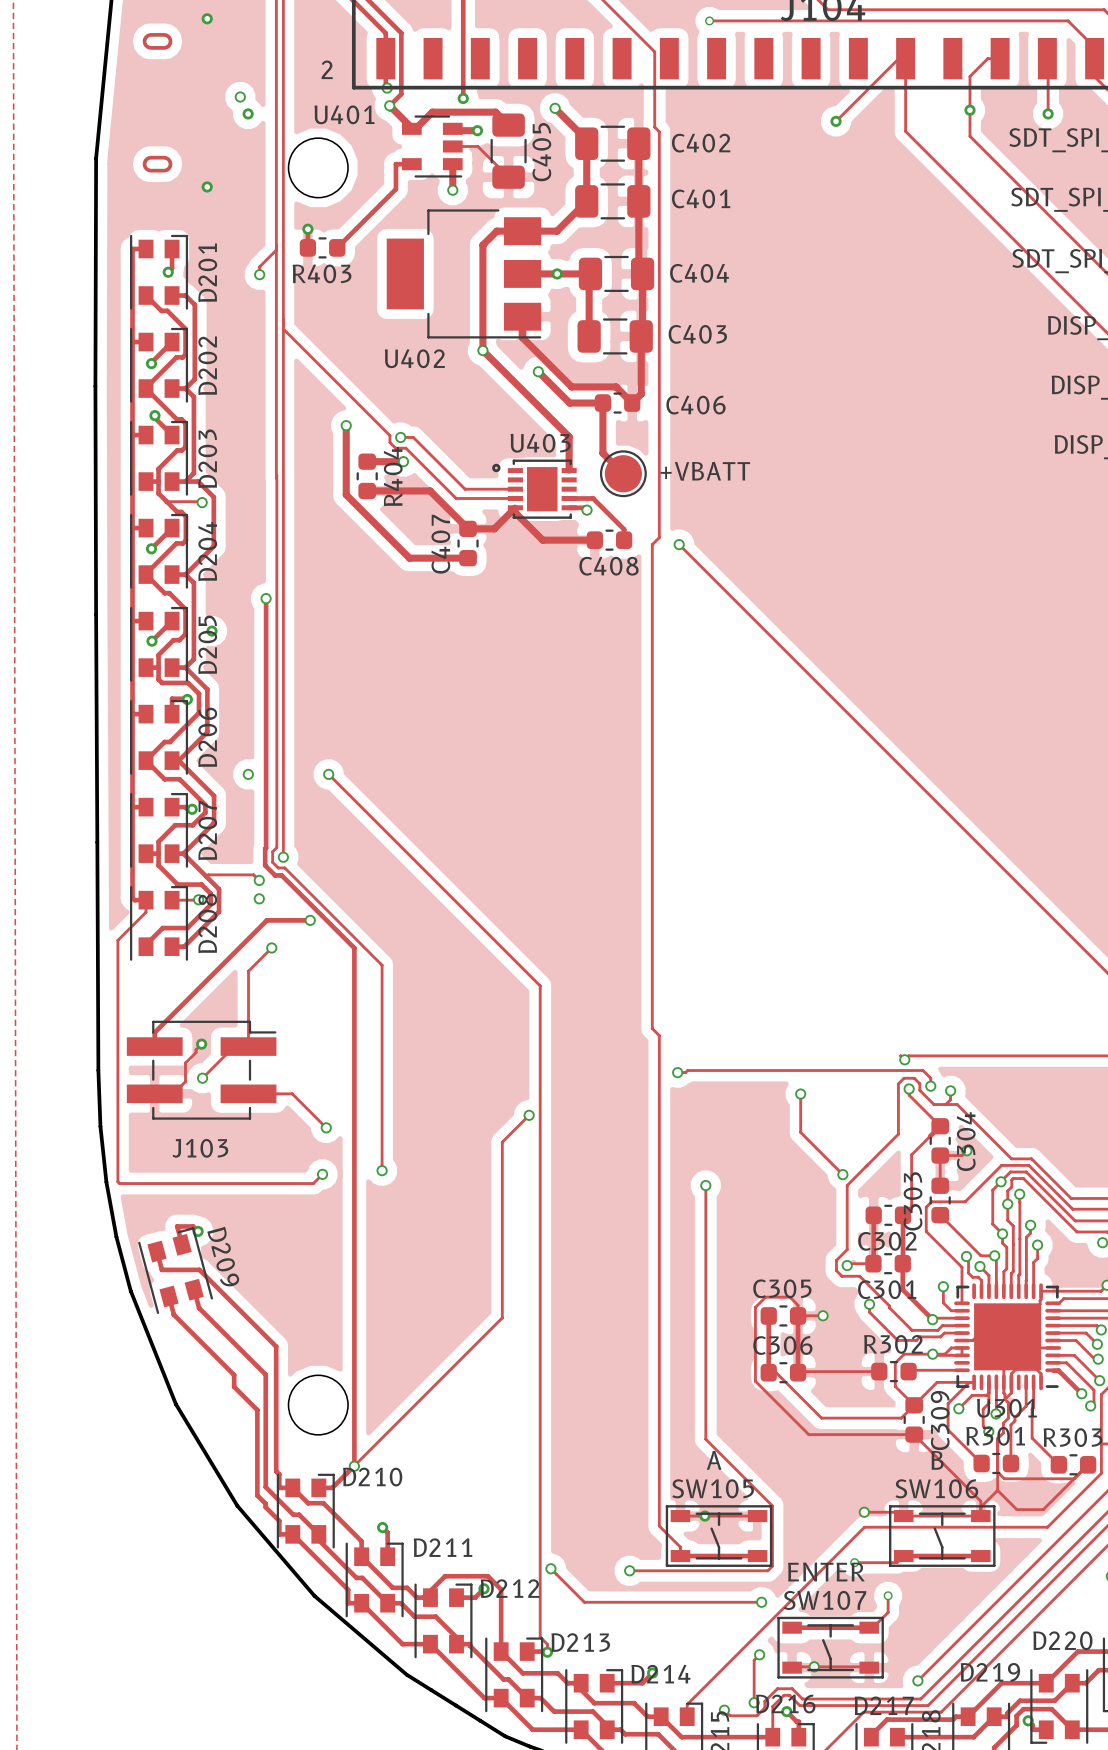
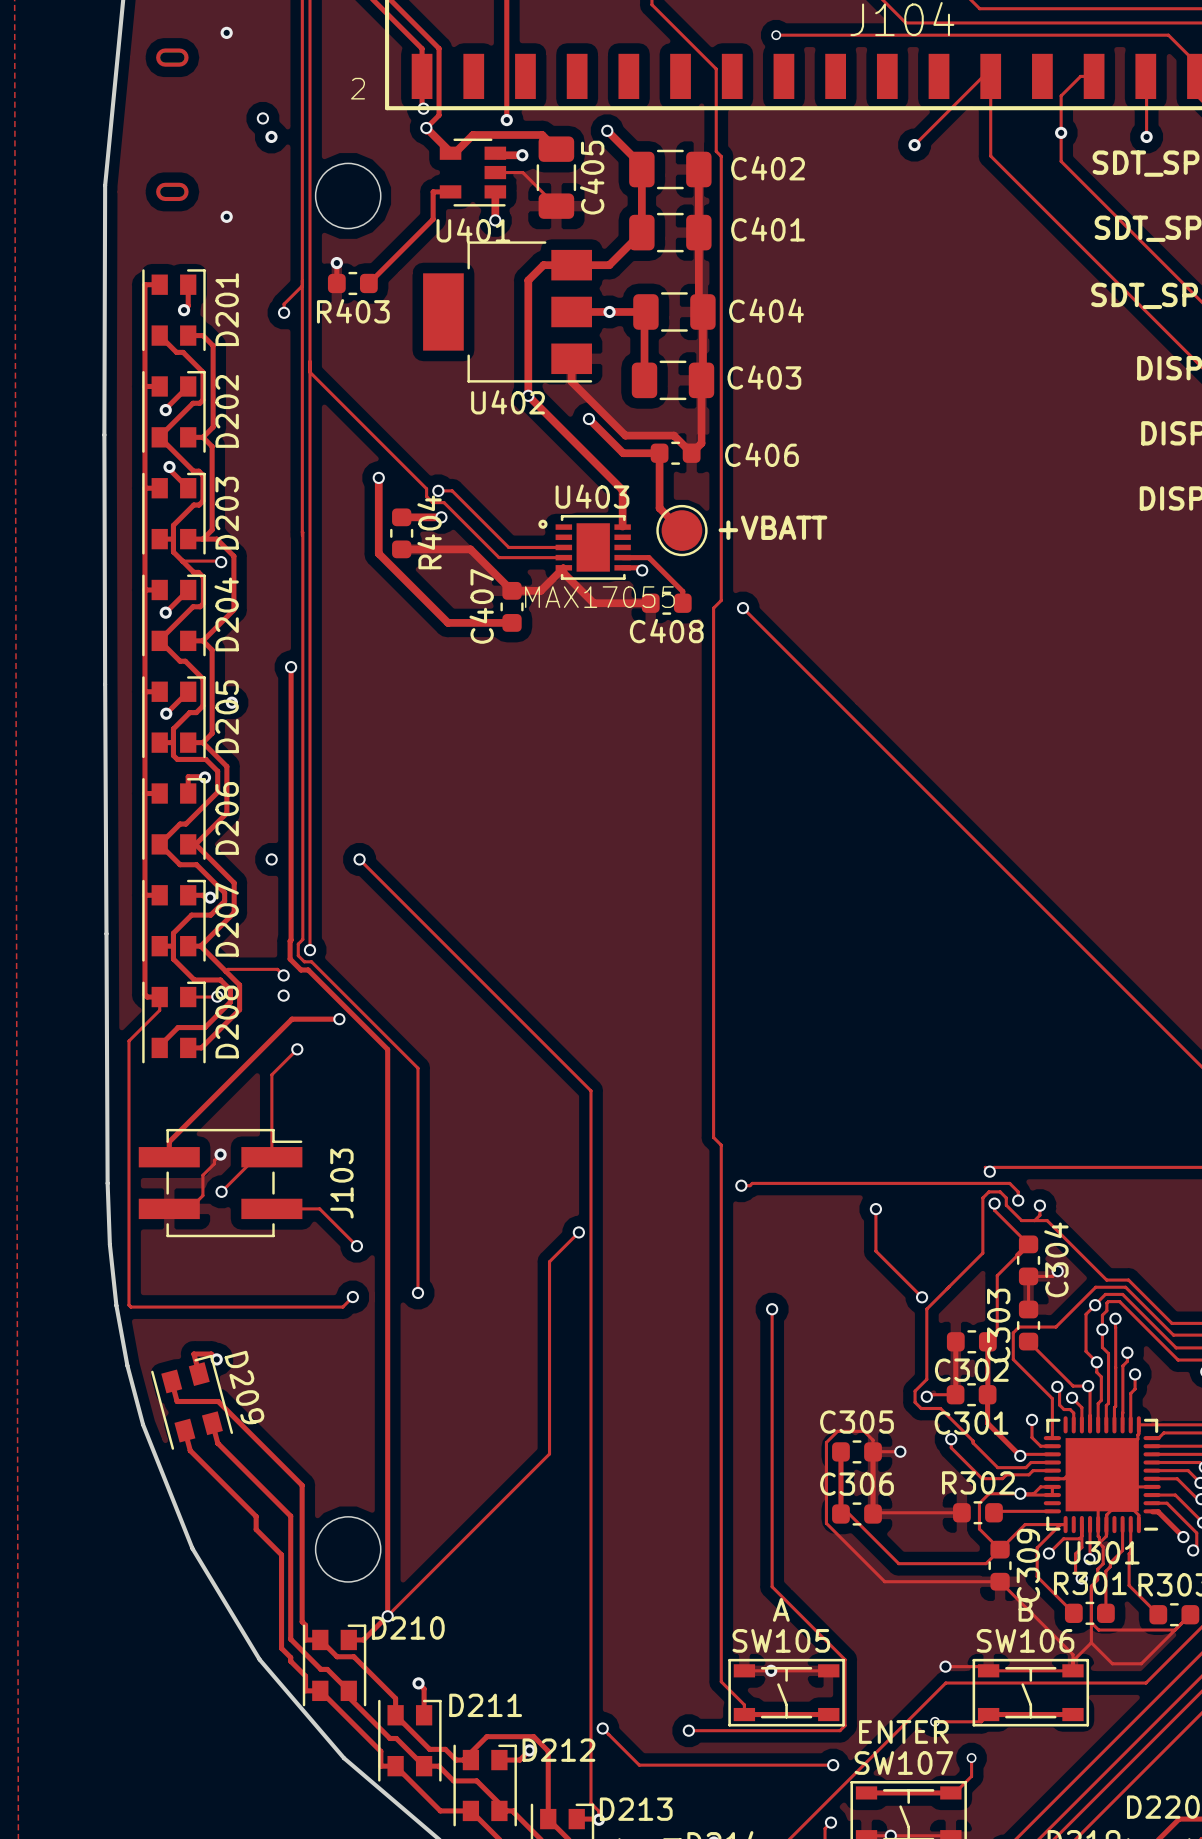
U401 name position: U401 (344, 114) -> U401 (473, 230)
U402 name position: U402 (414, 358) -> U402 (508, 402)
U403 value: none -> MAX17055 (599, 597)
J103 name rotation: 0° (200, 1148) -> 90° counterclockwise (341, 1183)
J103 name position: J103 (200, 1148) -> J103 (341, 1183)

